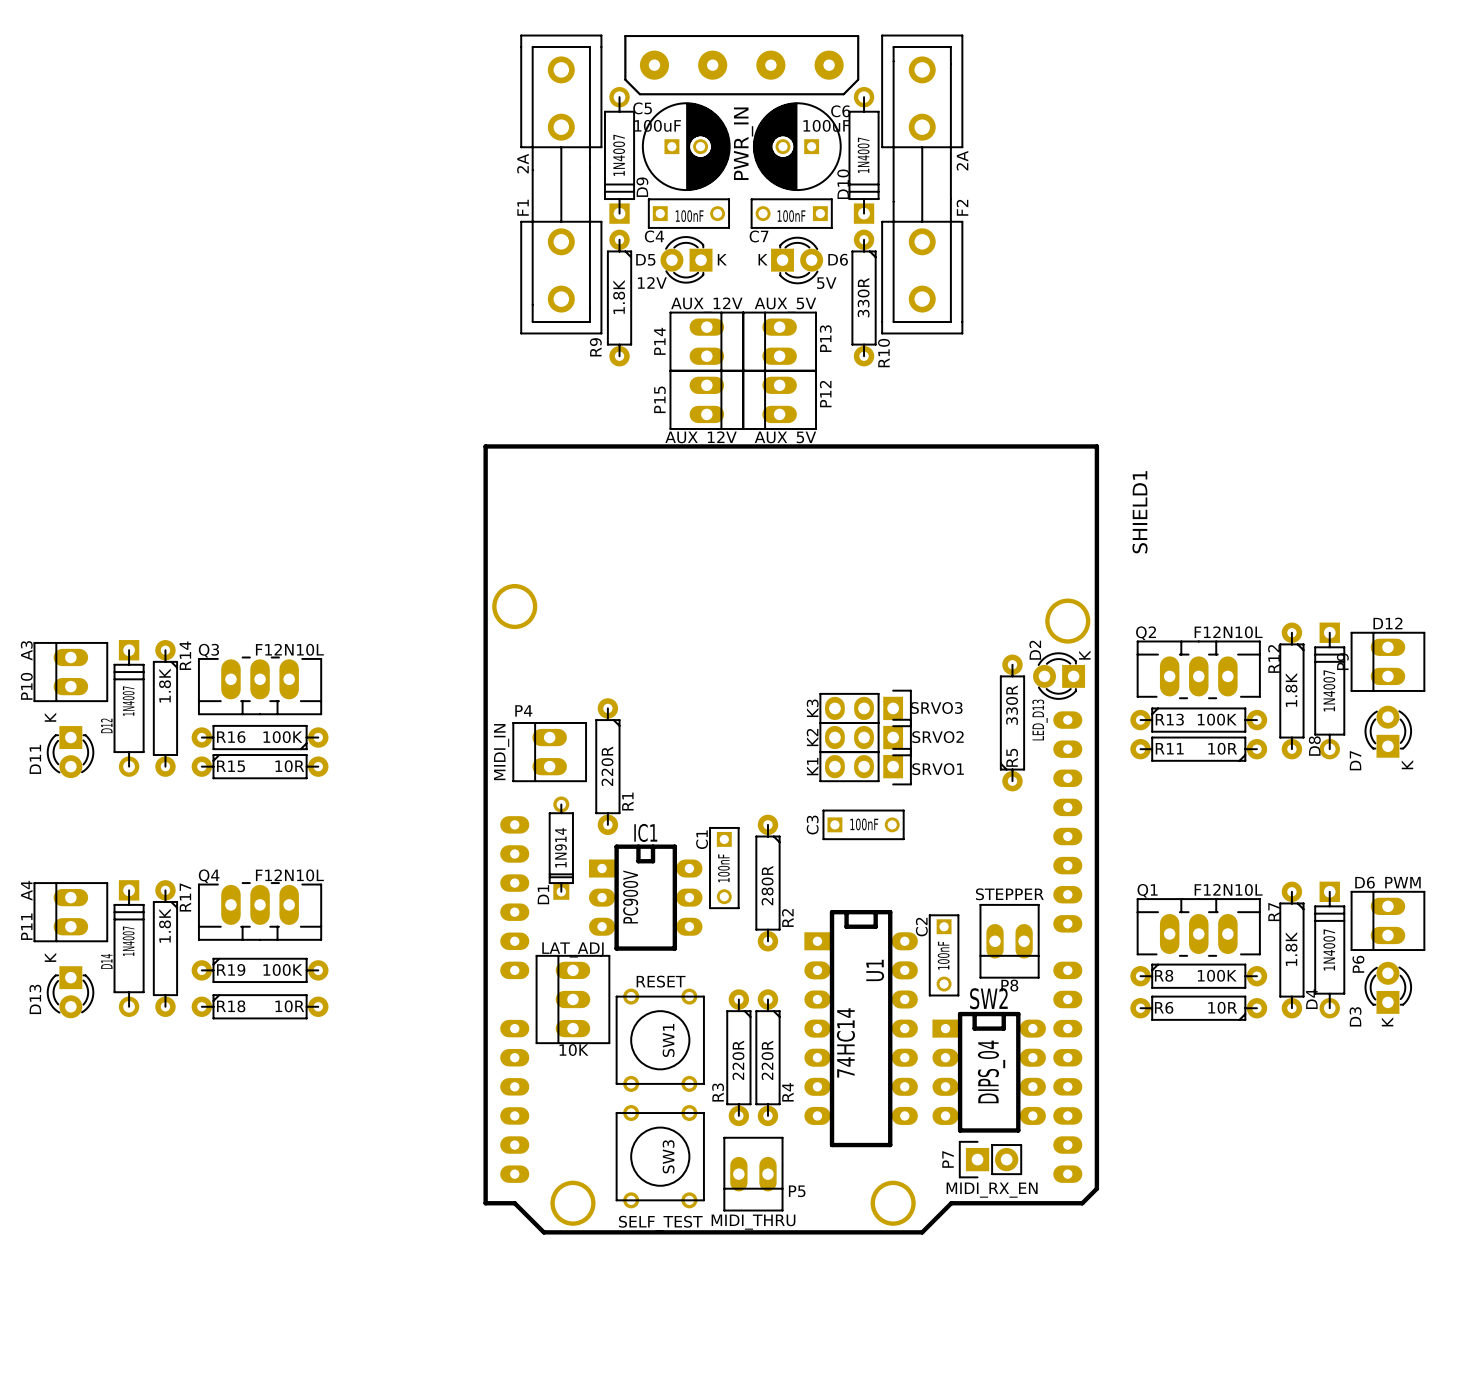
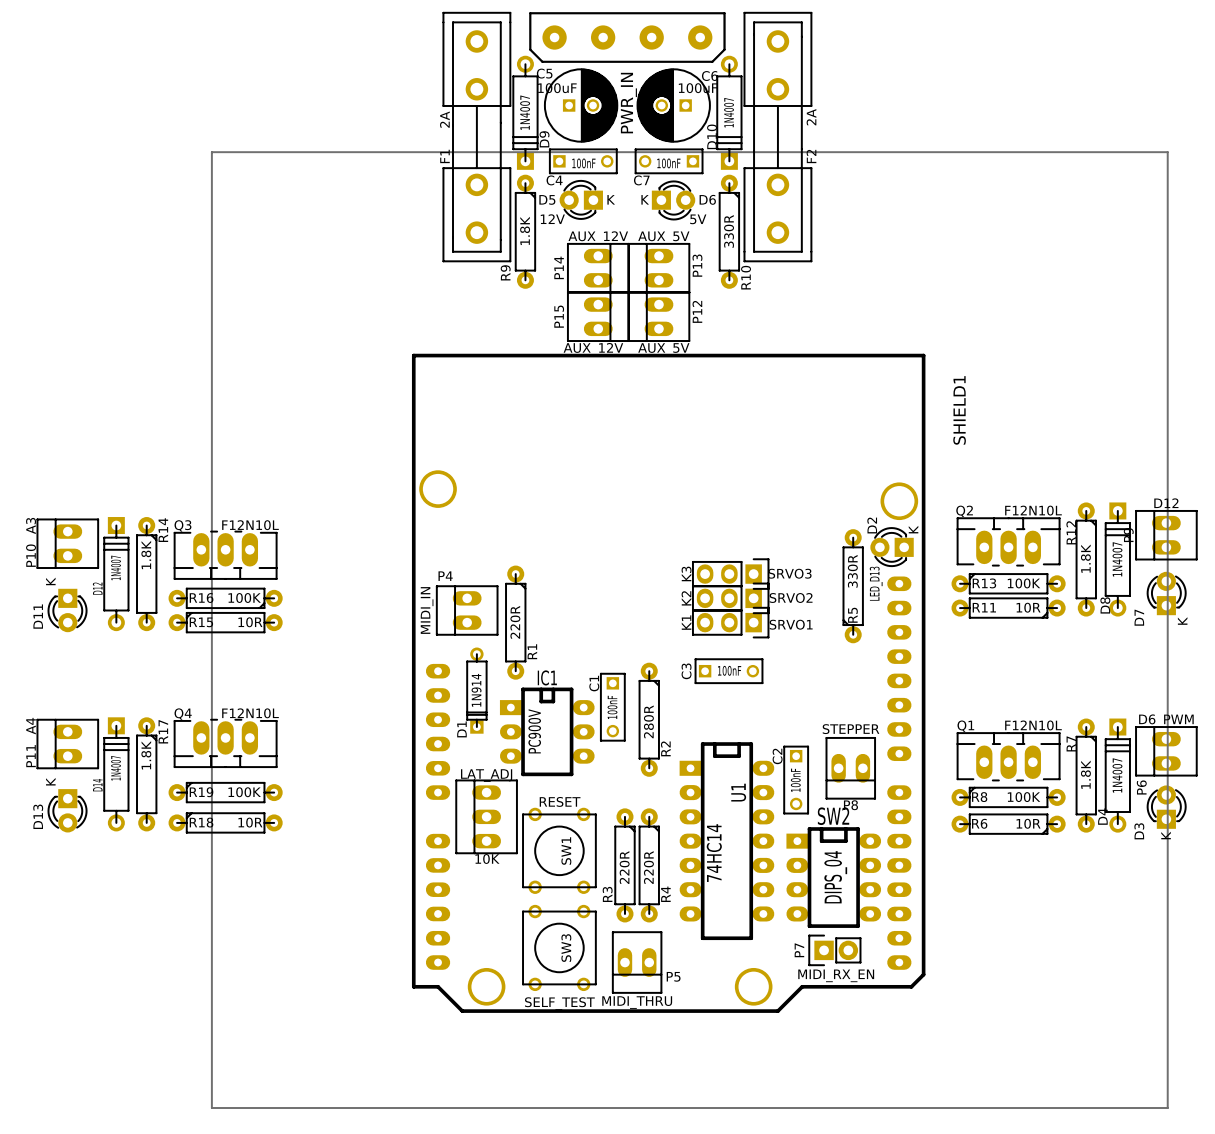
line: none -> (211, 152) (211, 1108) (1167, 1108) (1167, 152) (211, 152)

